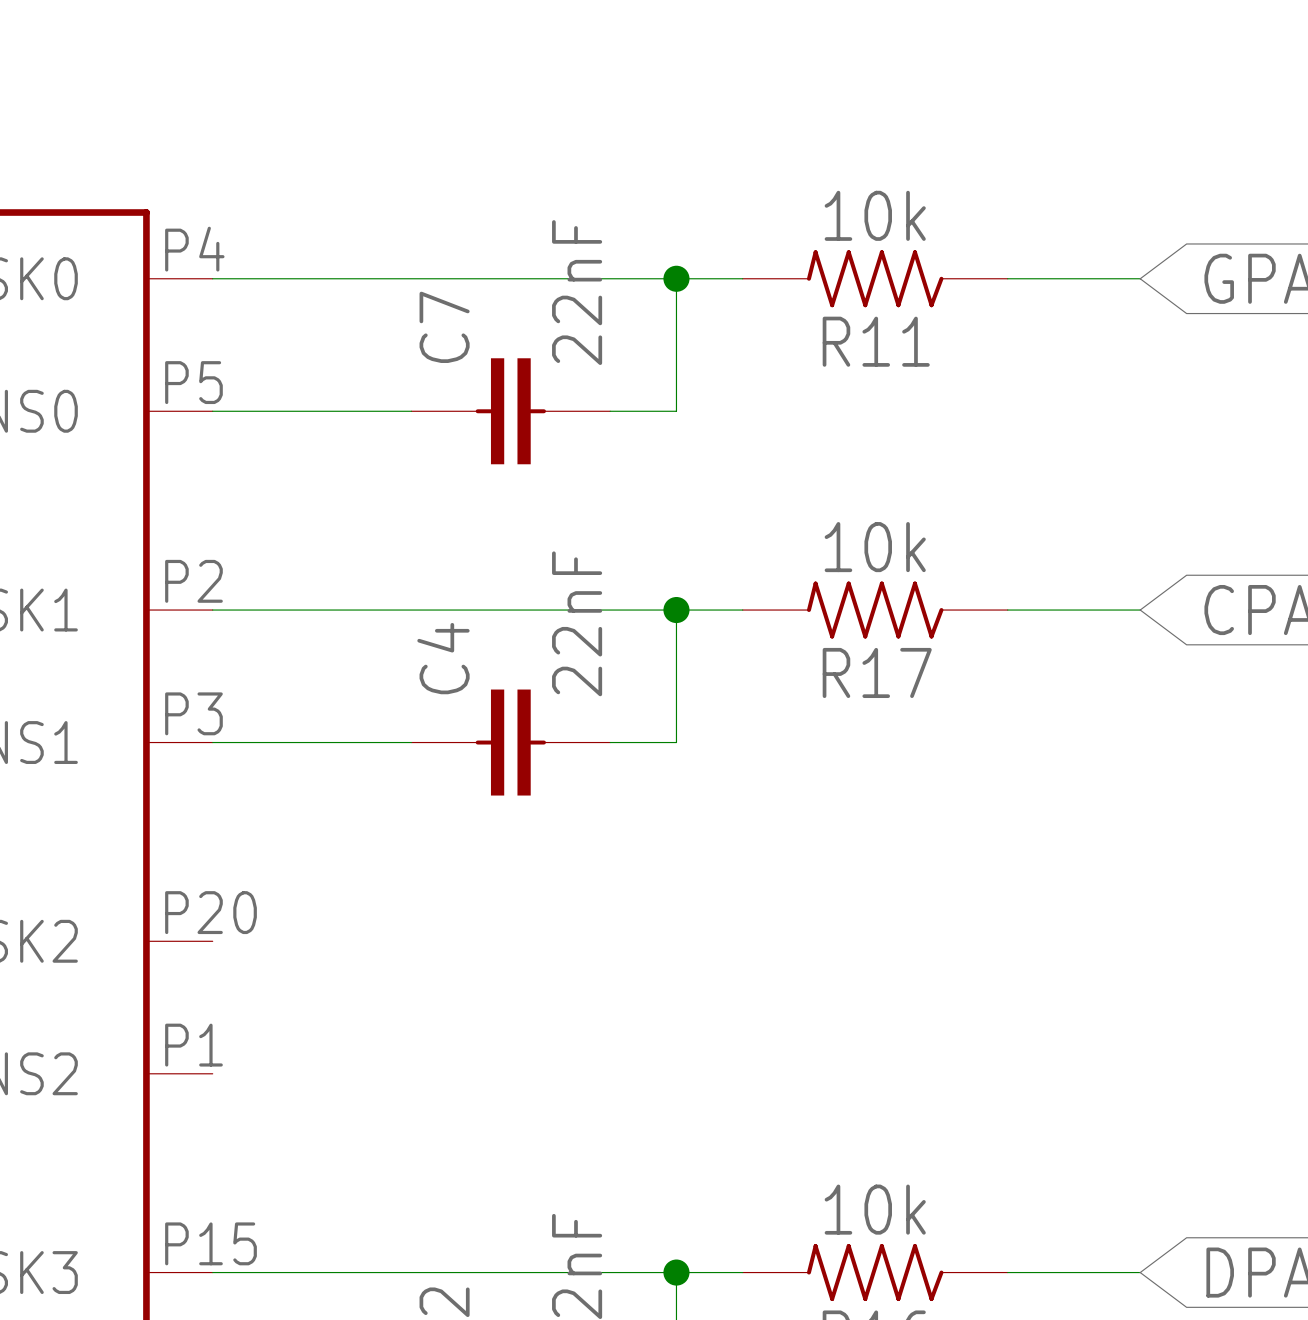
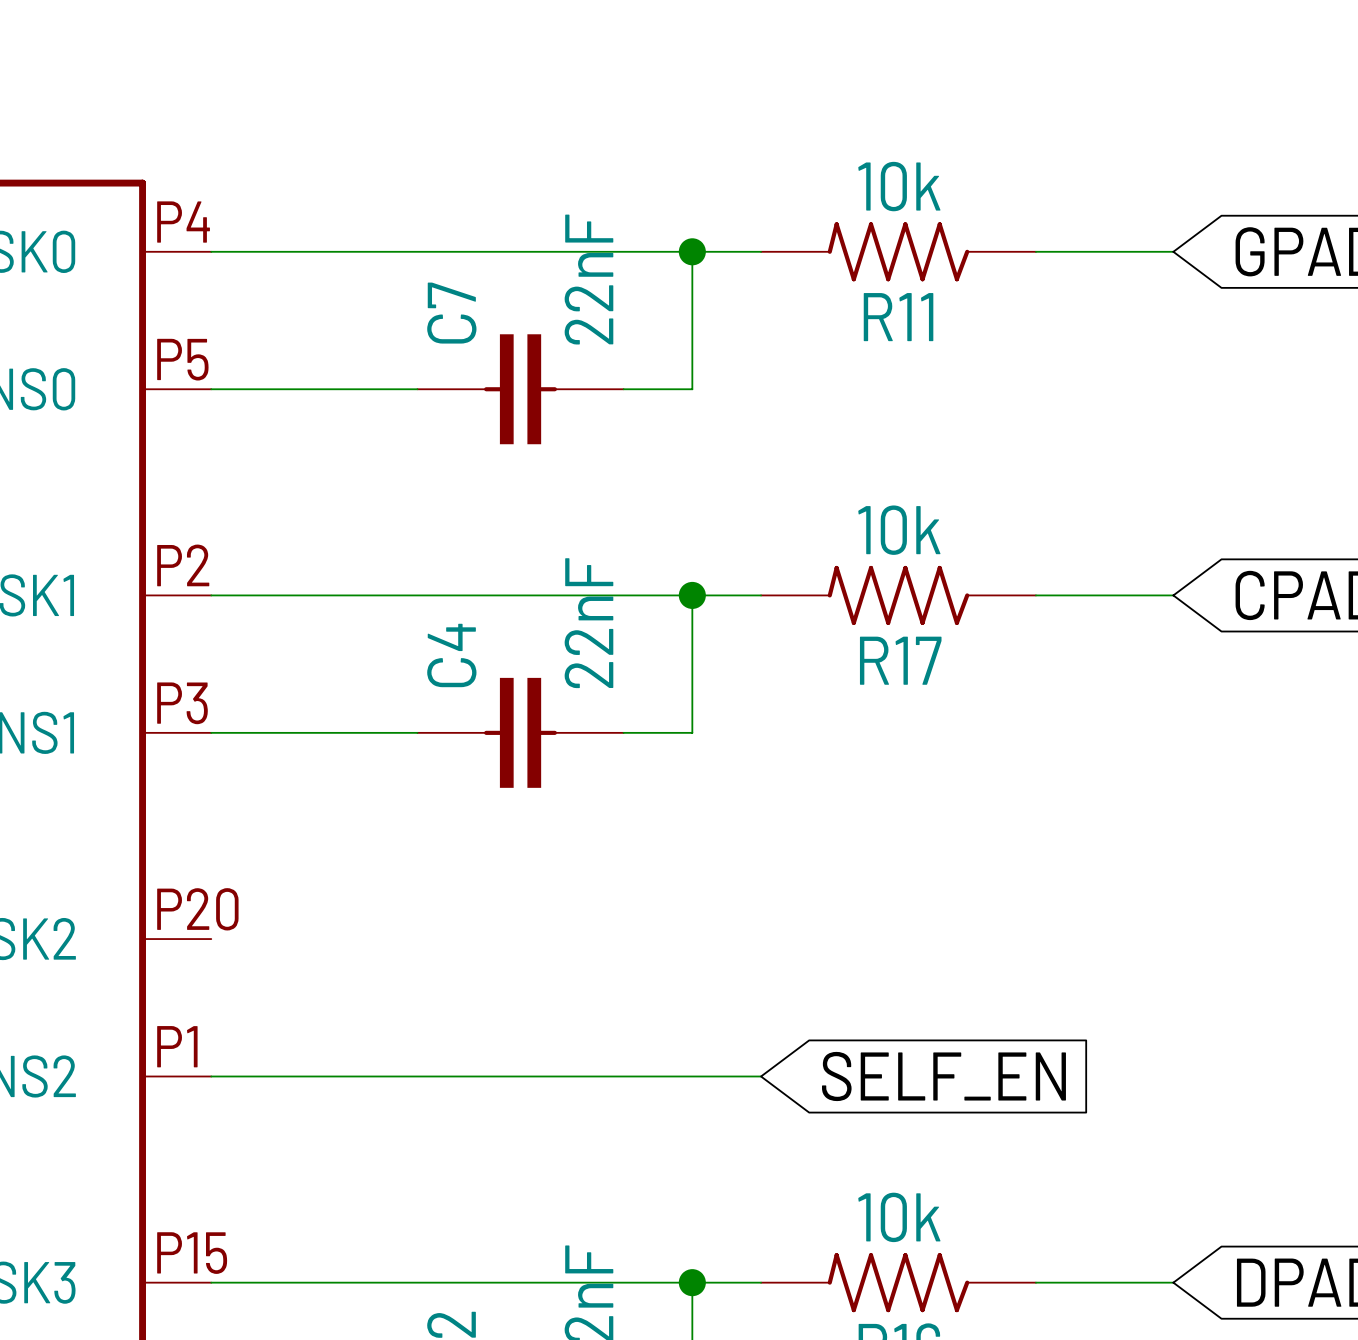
wire: none -> (211, 1076) (761, 1076)
global label: none -> SELF_EN (943, 1076)

